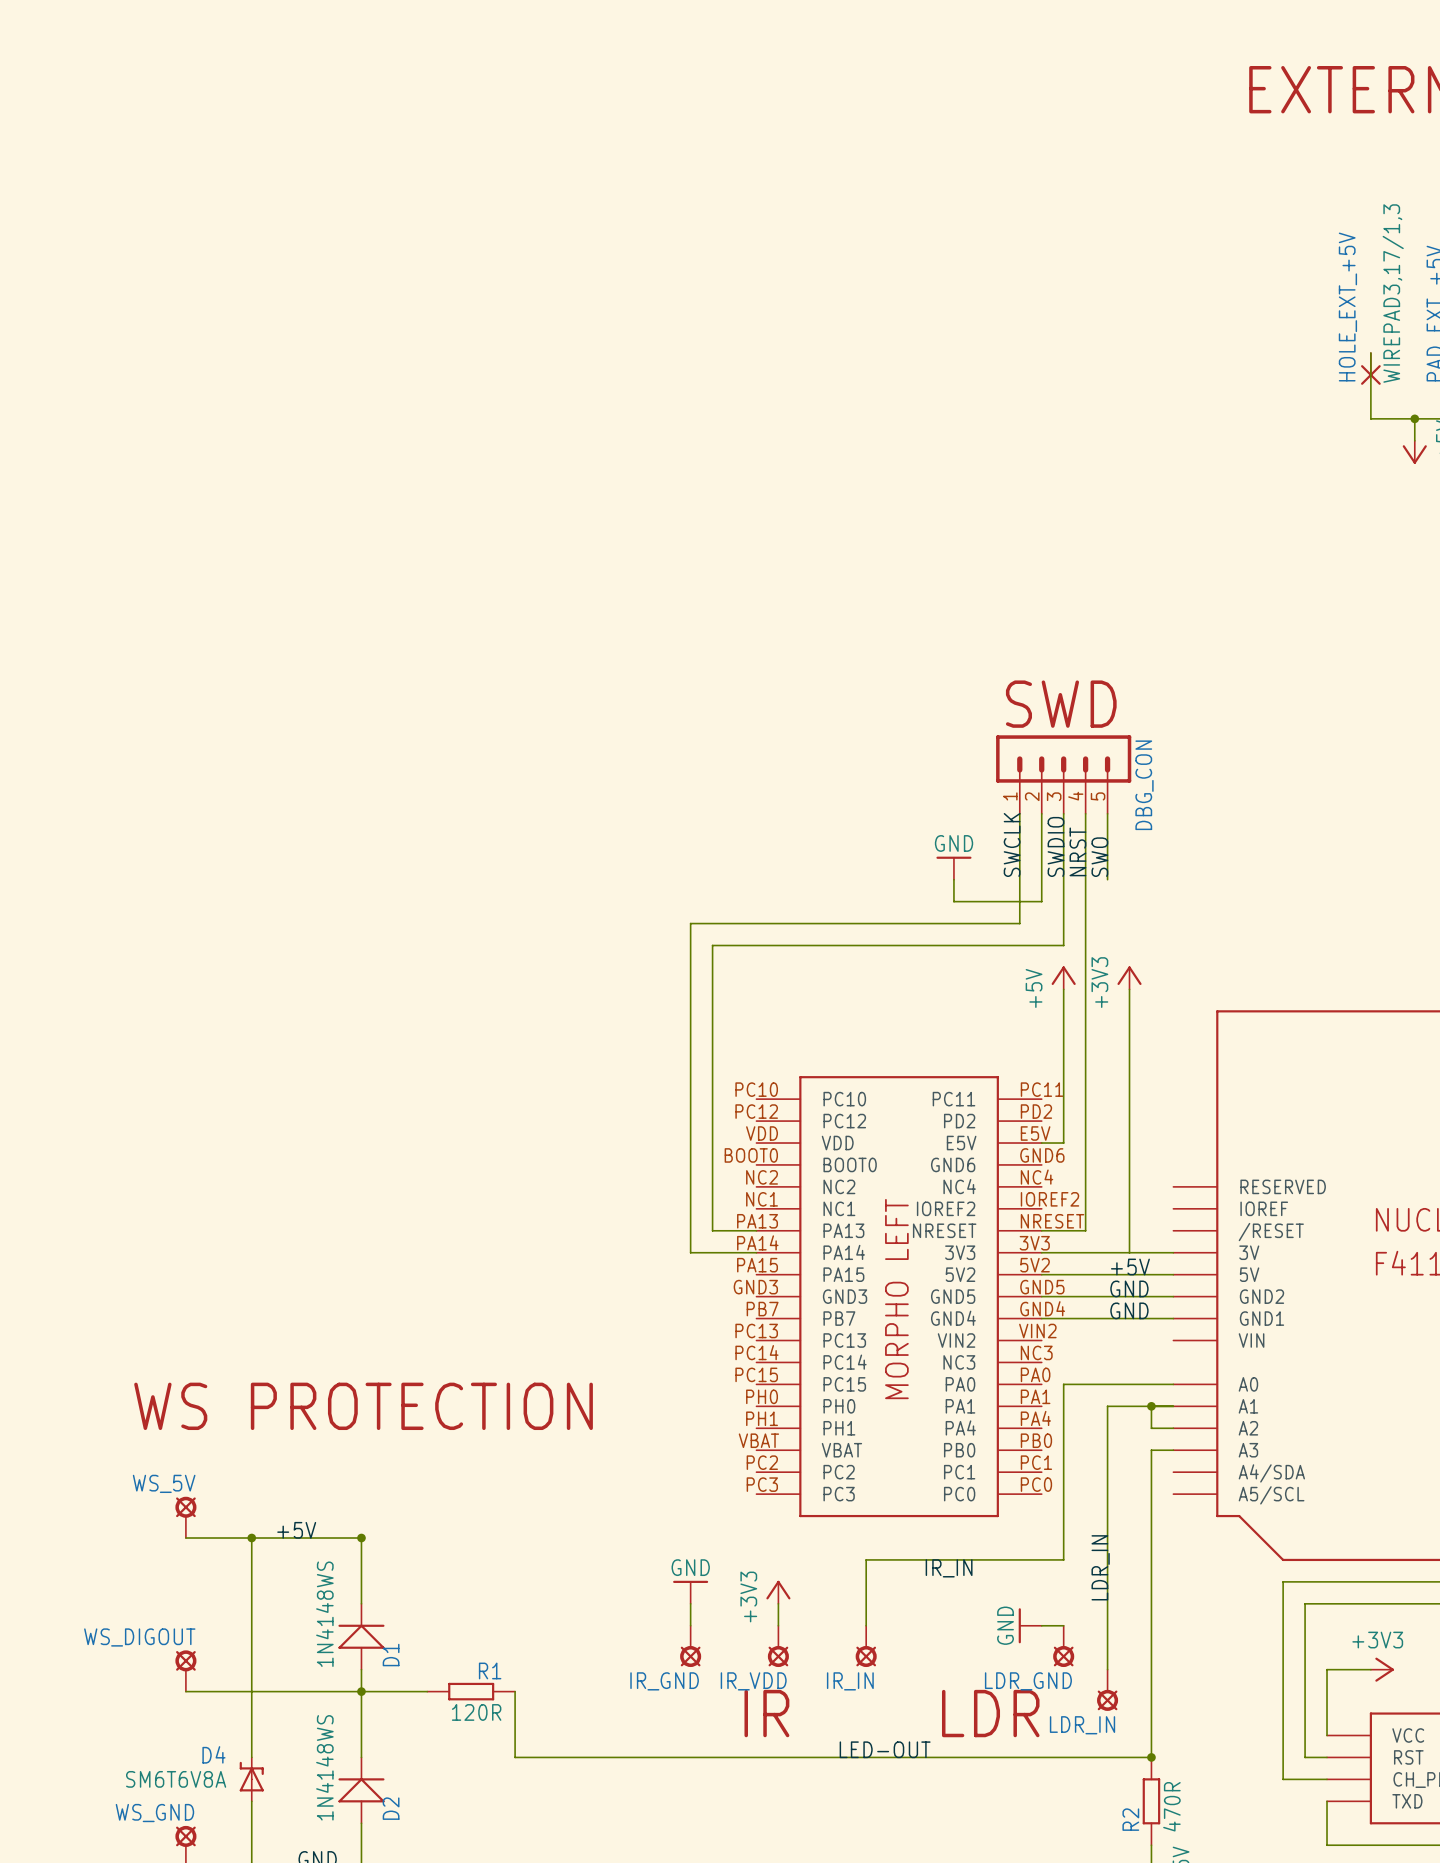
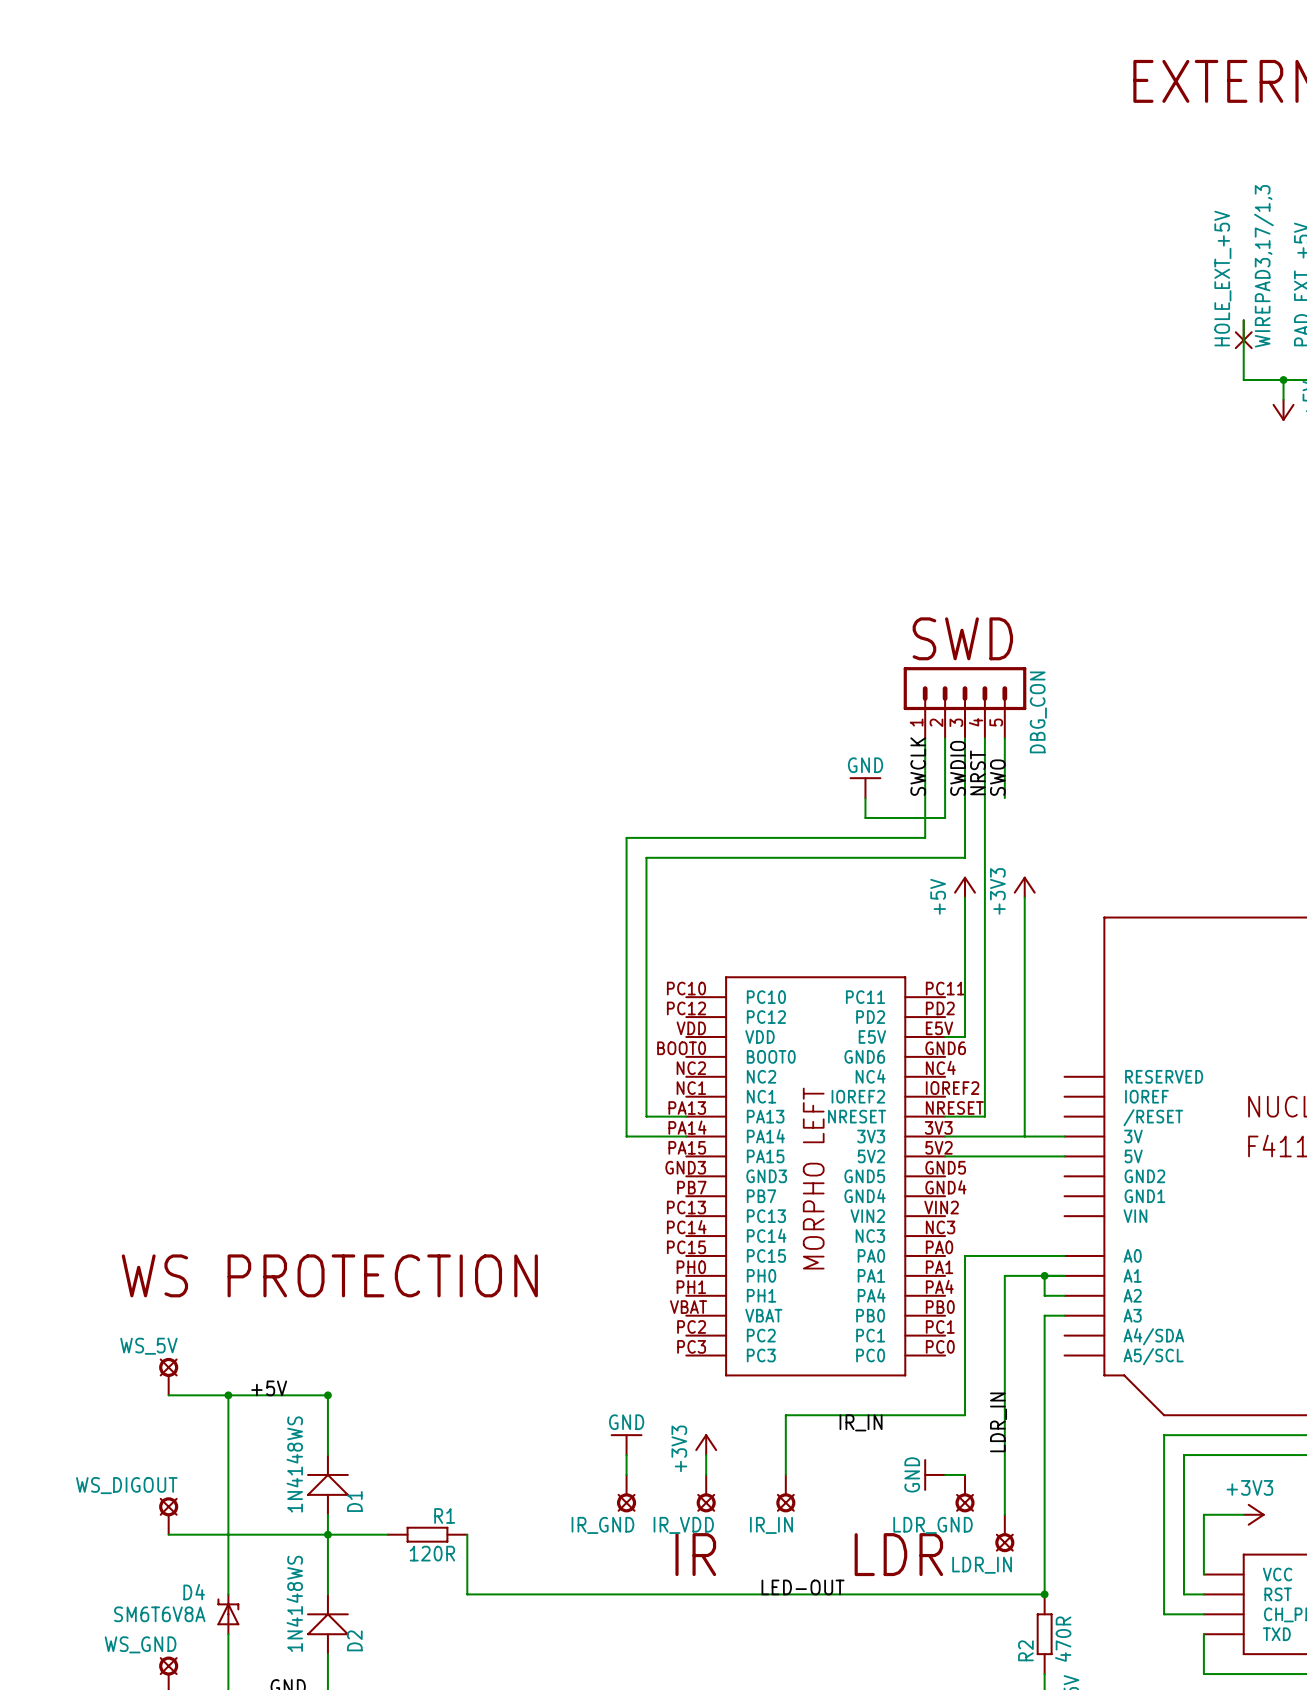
label: +5V (1130, 1266) -> none
label: GND (1129, 1288) -> none
wire: (1041, 1296) (1173, 1296) -> none
label: GND (1129, 1310) -> none
wire: (1041, 1318) (1173, 1318) -> none

